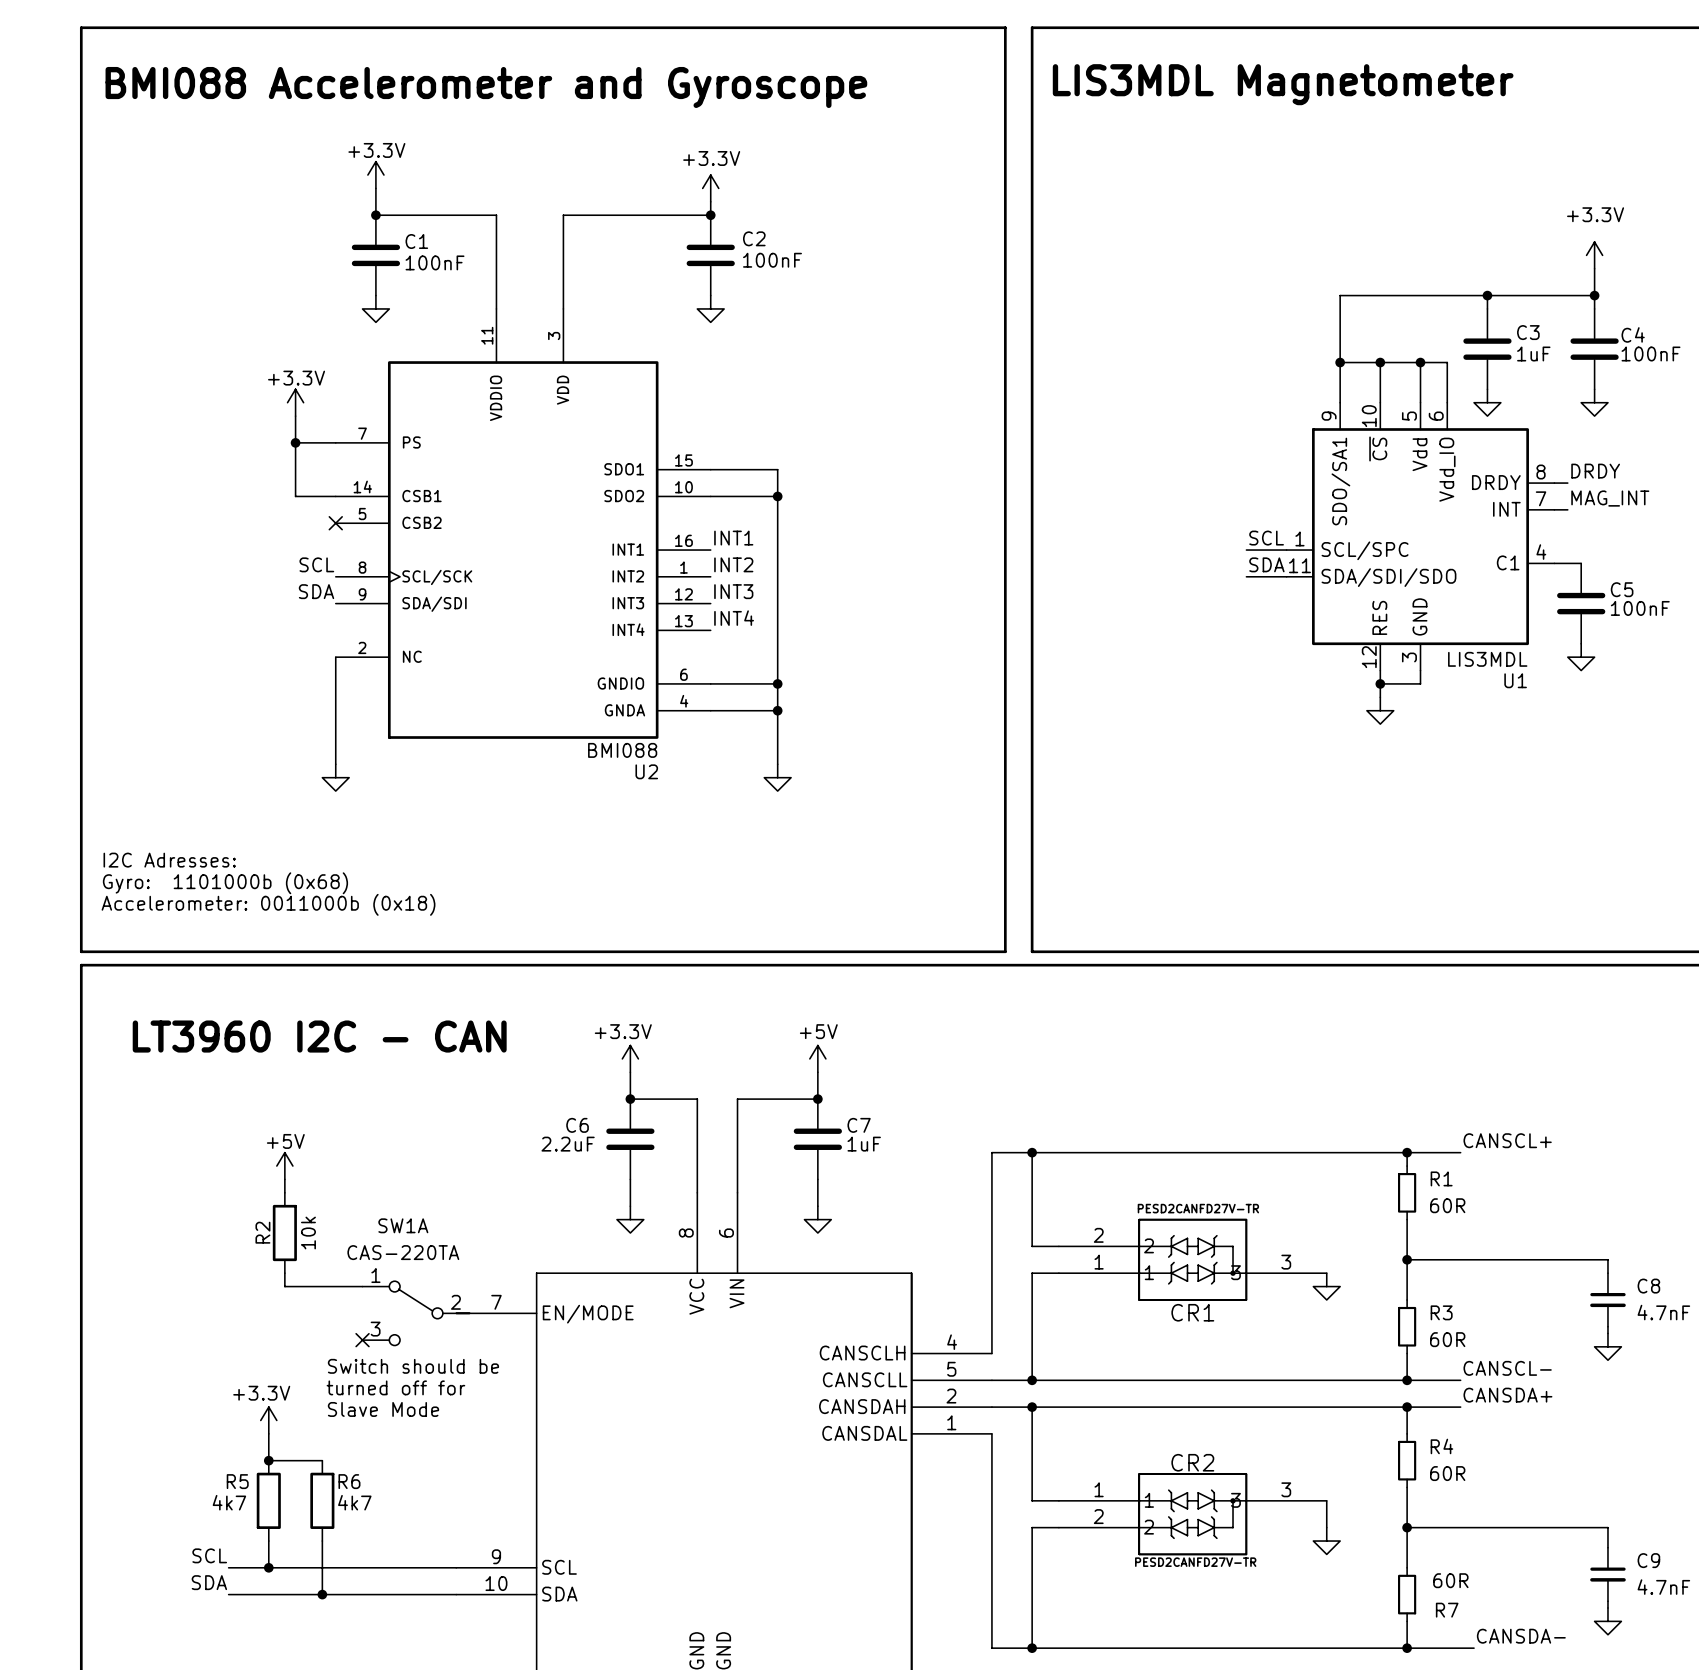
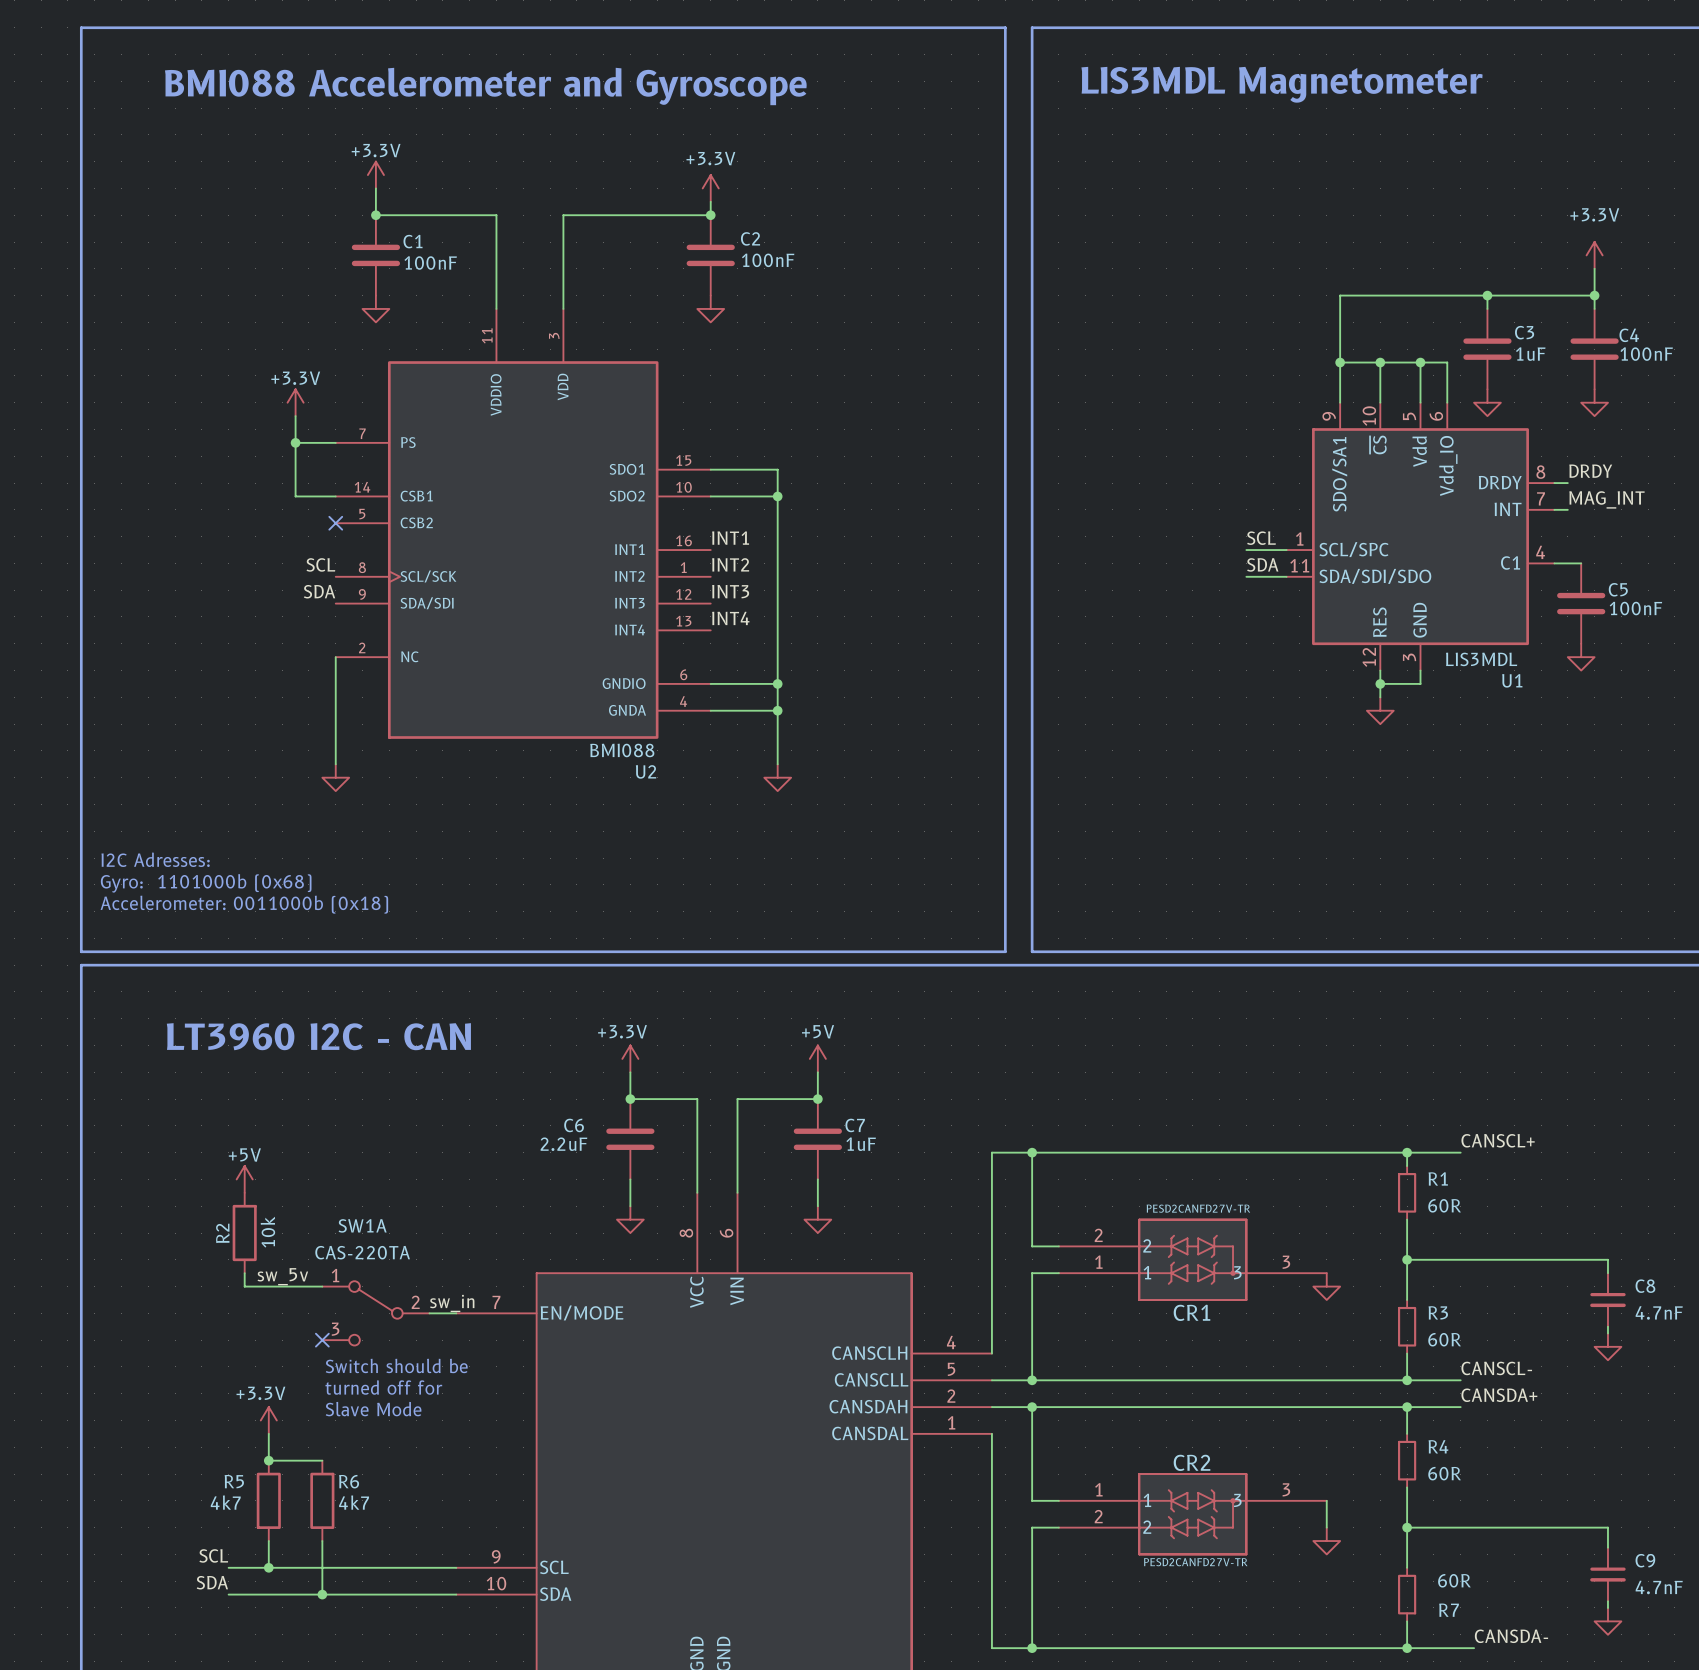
power symbol position: +5V (284, 1166) -> +5V (244, 1179)
wire: (284, 1179) (284, 1192) -> none
R2 position: (284, 1233) -> (244, 1233)
wire: (284, 1273) (284, 1286) -> (244, 1273) (244, 1286) (284, 1286)
label: none -> sw_5v (282, 1276)
label: none -> sw_in (452, 1303)
SW1A position: (416, 1313) -> (375, 1313)
no-connect mark position: (362, 1340) -> (322, 1340)

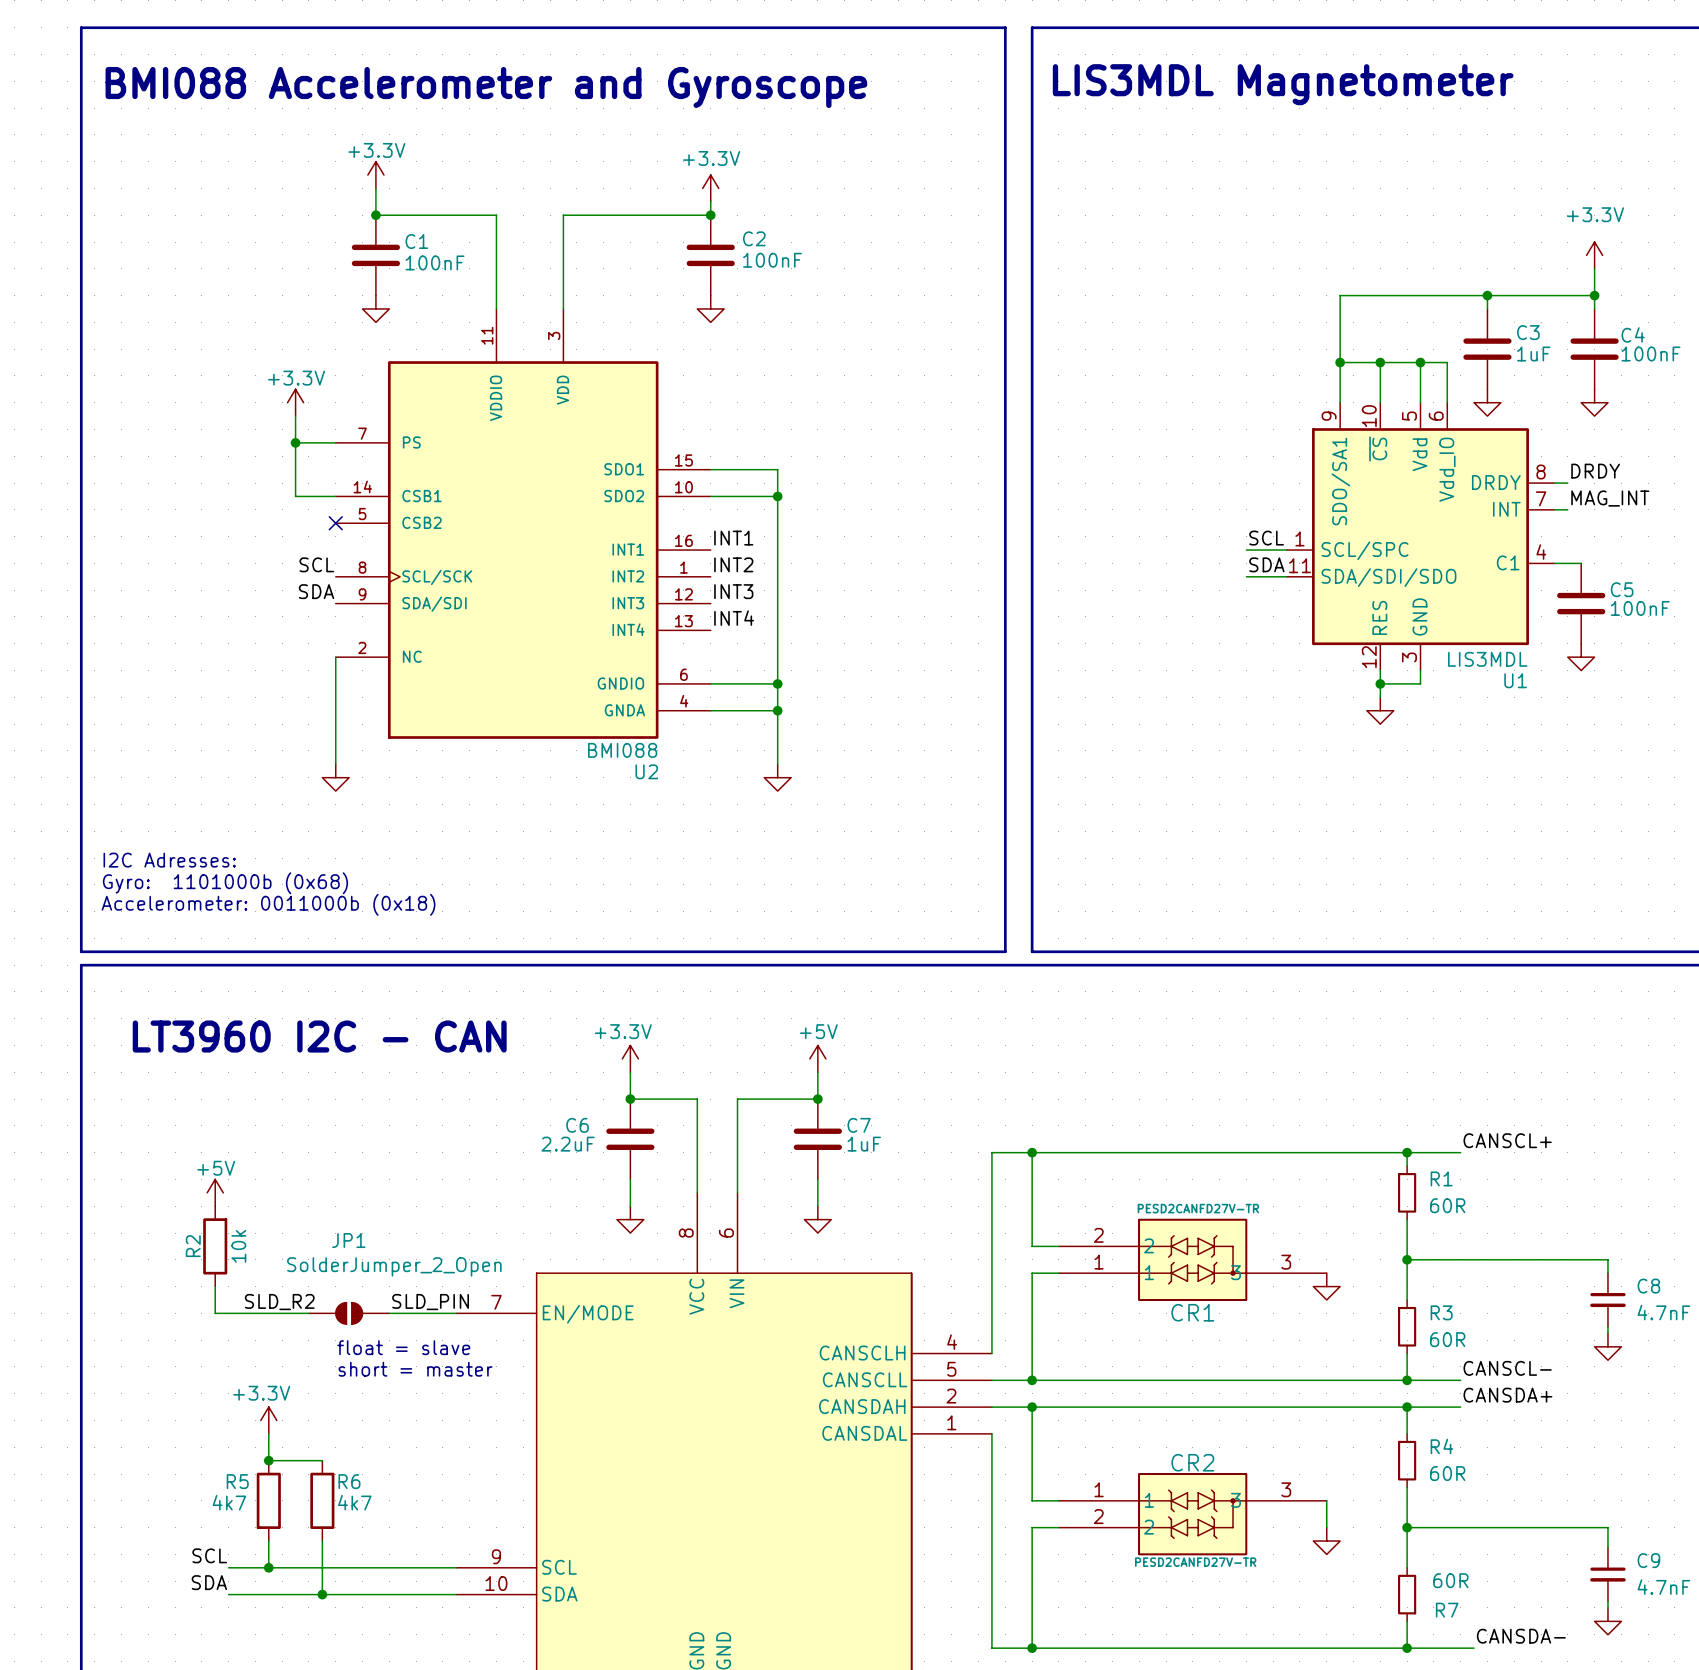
power symbol position: +5V (244, 1179) -> +5V (215, 1192)
R2 position: (244, 1233) -> (215, 1246)
wire: (244, 1273) (244, 1286) (322, 1286) -> none
label: sw_5v (282, 1276) -> none
wire: none -> (215, 1286) (215, 1313) (308, 1313)
label: none -> SLD_R2 (279, 1302)
label: none -> SLD_PIN (430, 1302)
label: sw_in (452, 1303) -> none
JP1: none -> SolderJumper_2_Open (349, 1313)
SW1A: CAS-220TA (375, 1313) -> none
no-connect mark: (322, 1340) -> none
text: none -> float = slave (403, 1347)
text: Switch should be (396, 1365) -> none
text: none -> short = master (415, 1369)
text: turned off for (383, 1387) -> none
text: Slave Mode (373, 1409) -> none

